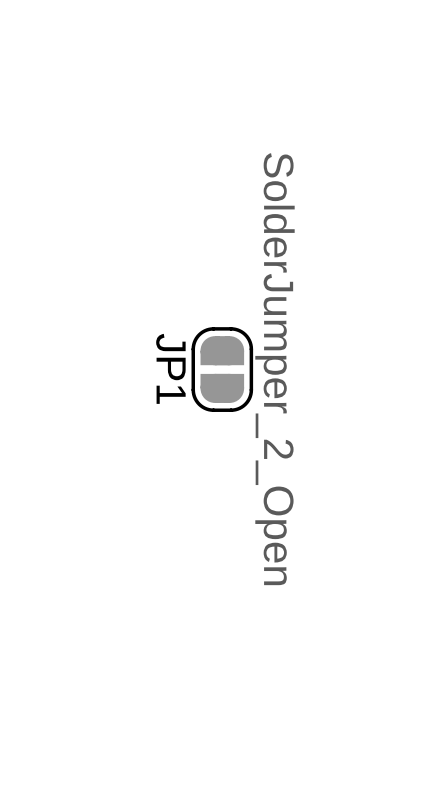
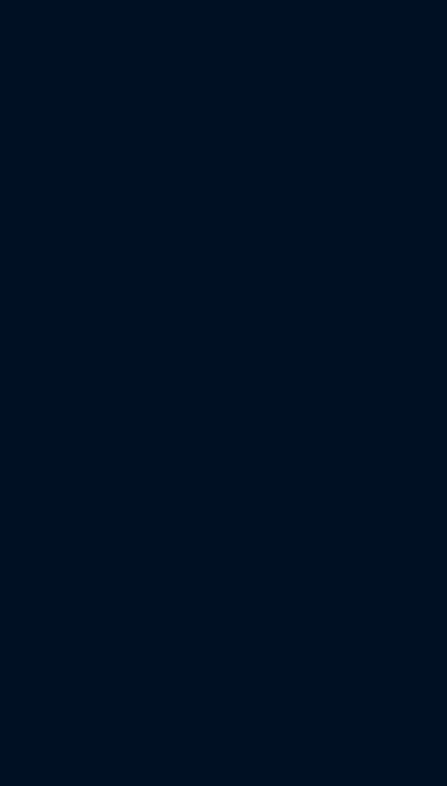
JP1: SolderJumper_2_Open (222, 369) -> none

